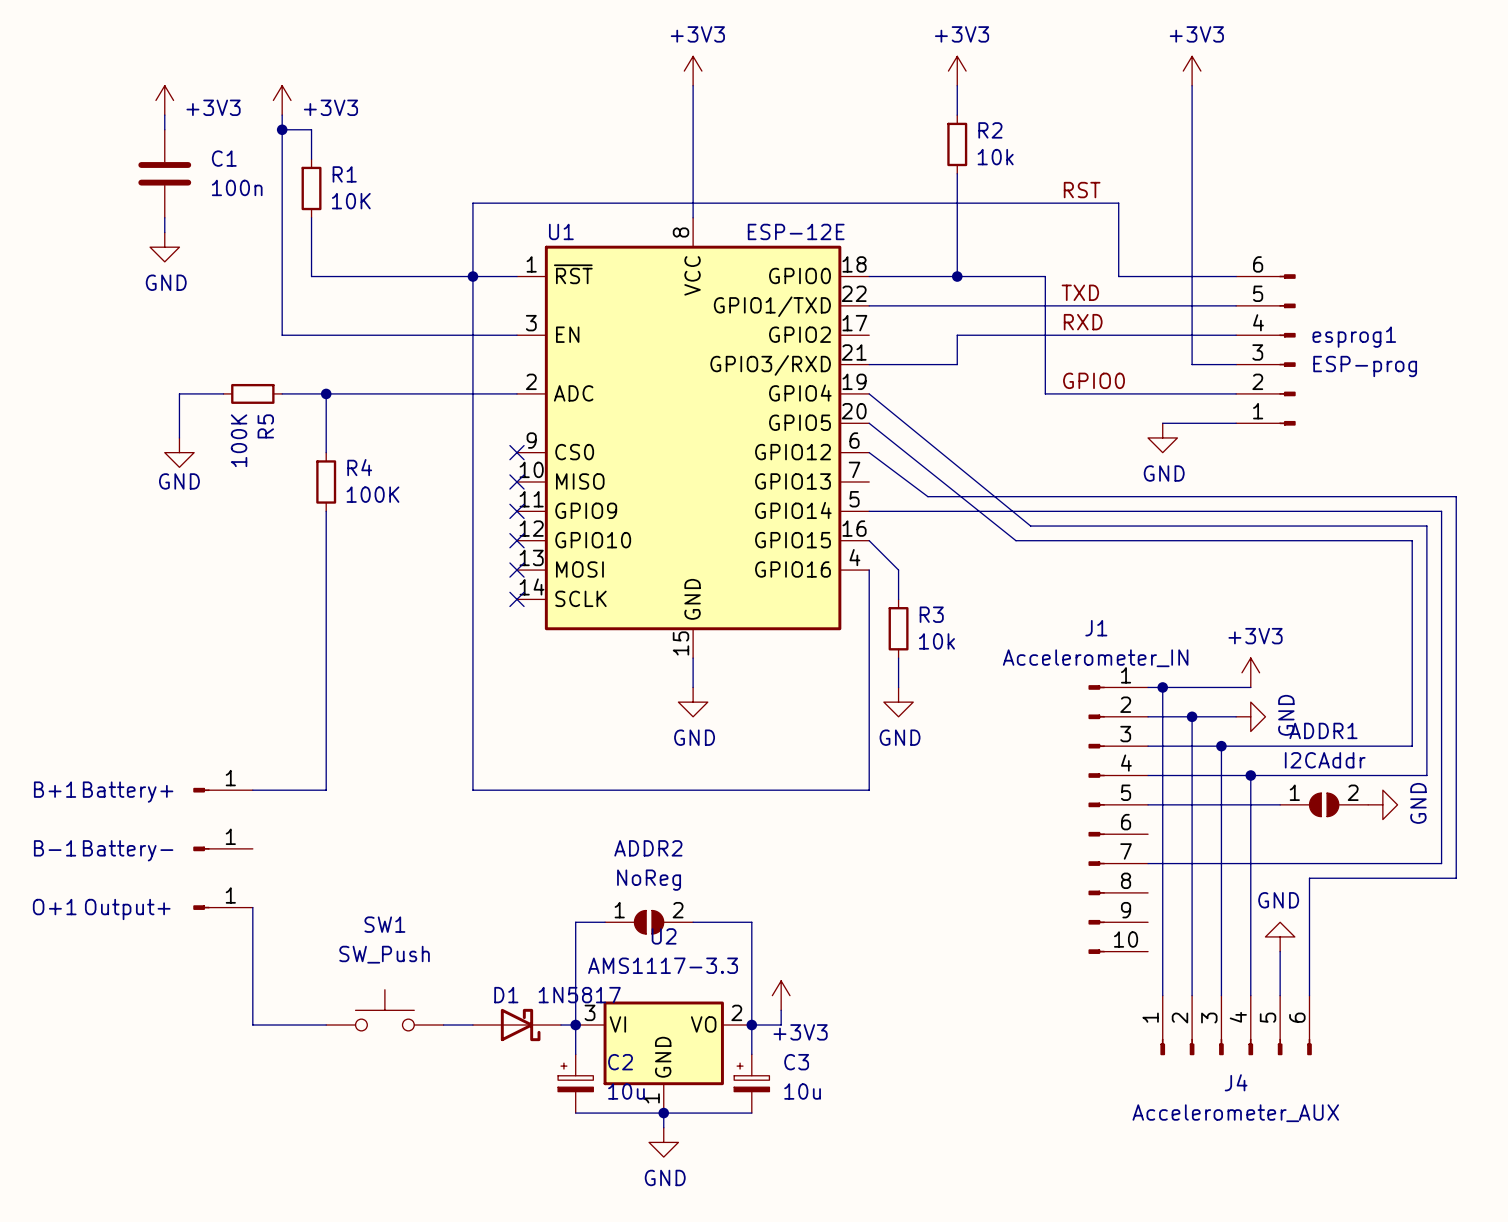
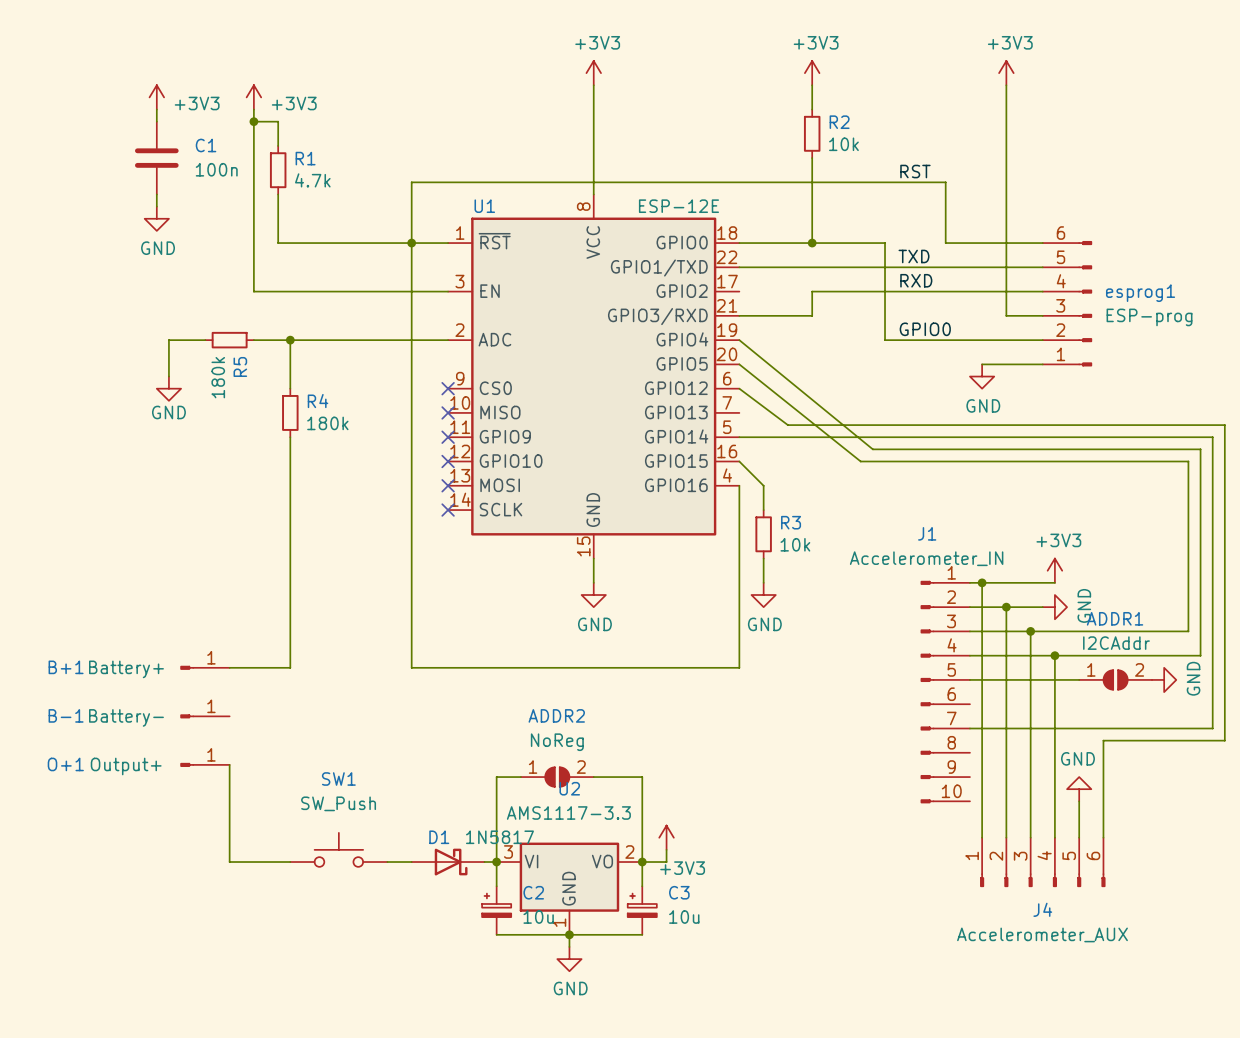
R1 value: 10K (351, 201) -> 4.7k (312, 180)
R5 value: 100K (239, 440) -> 180k (218, 377)
R4 value: 100K (372, 494) -> 180k (327, 423)

